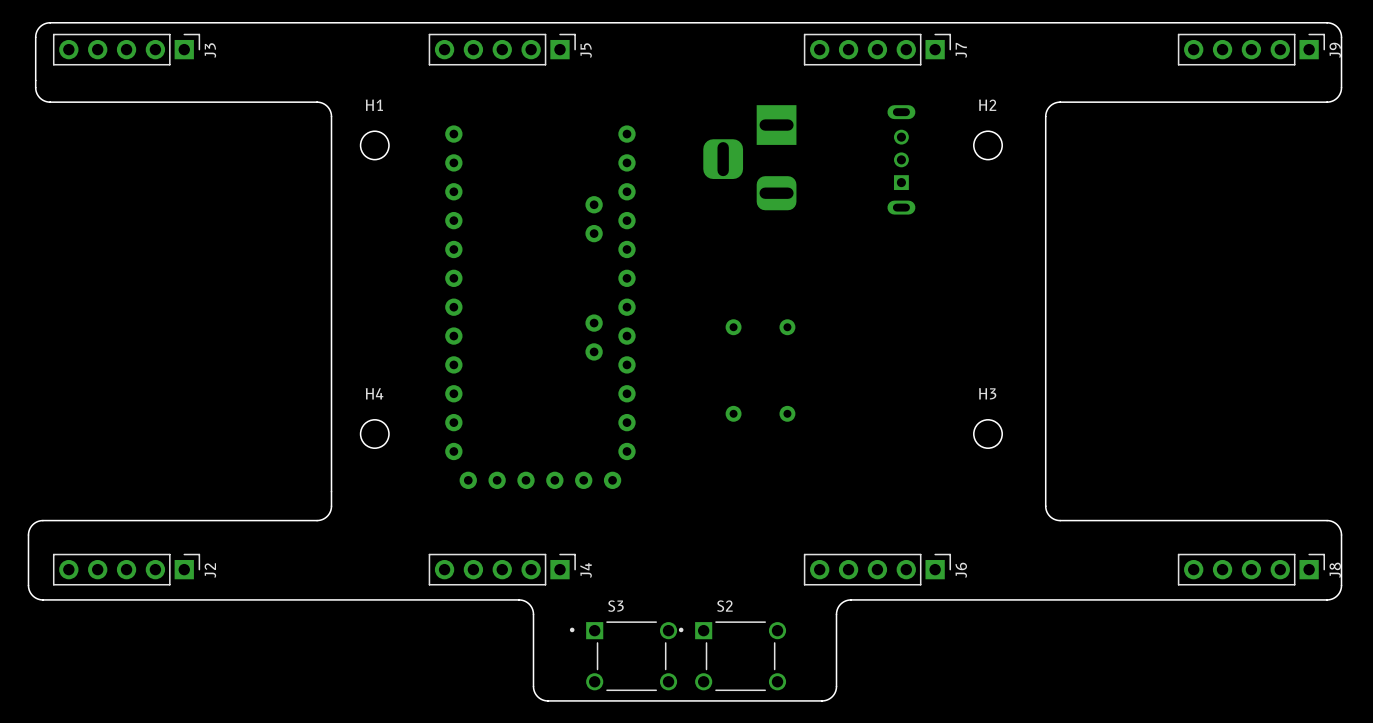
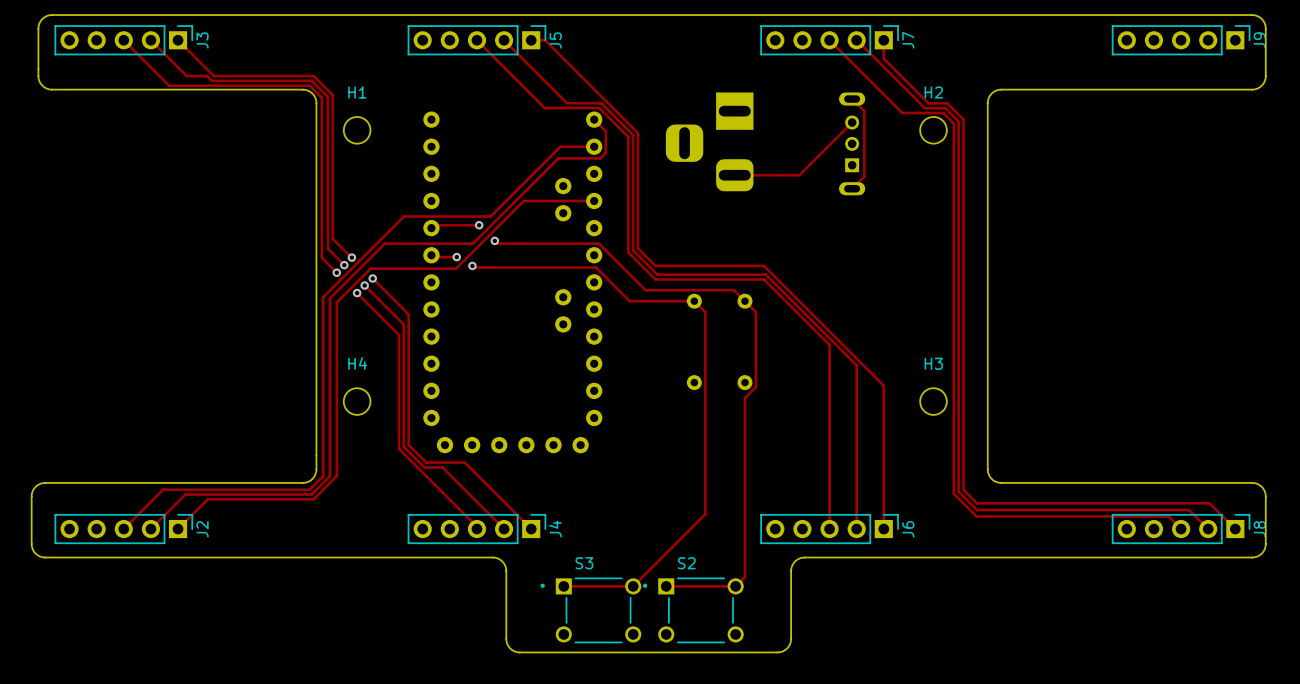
track: none -> (123, 40) (169, 85) (309, 85) (321, 97) (321, 257) (336, 272)
track: none -> (150, 40) (186, 76) (207, 76) (211, 80) (311, 80) (327, 97) (327, 248) (344, 265)
track: none -> (178, 40) (213, 76) (313, 76) (332, 95) (332, 238) (351, 257)
track: none -> (476, 40) (544, 108) (599, 108) (628, 137) (628, 252) (655, 279) (763, 279) (829, 345) (829, 529)
track: none -> (504, 40) (567, 103) (601, 103) (633, 135) (633, 250) (657, 274) (765, 274) (856, 365) (856, 529)
track: none -> (531, 40) (545, 40) (637, 133) (637, 248) (655, 265) (764, 265) (883, 385) (883, 529)
track: none -> (829, 40) (902, 112) (943, 112) (953, 123) (953, 493) (976, 516) (1168, 516) (1181, 529)
track: none -> (856, 40) (924, 108) (945, 108) (958, 121) (958, 491) (976, 510) (1189, 510) (1208, 529)
track: none -> (883, 40) (883, 58) (928, 103) (947, 103) (963, 119) (963, 489) (976, 503) (1209, 503) (1235, 529)
track: none -> (852, 99) (864, 111) (864, 176) (852, 188)
track: none -> (594, 119) (605, 131) (605, 152) (600, 158) (558, 158) (473, 243) (384, 243) (330, 298) (330, 476) (311, 494) (185, 494) (150, 529)
track: none -> (852, 122) (799, 175) (734, 175)
track: none -> (594, 146) (560, 146) (490, 216) (403, 216) (323, 297) (323, 476) (309, 489) (163, 489) (123, 529)
track: none -> (594, 200) (523, 200) (456, 268) (370, 268) (336, 302) (336, 476) (313, 499) (207, 499) (178, 529)
track: none -> (479, 225) (434, 225) (431, 228)
via: none -> (479, 225)
track: none -> (494, 240) (497, 243) (599, 243) (645, 290) (734, 290) (755, 312) (755, 387) (745, 398) (745, 577) (735, 586) (666, 586)
via: none -> (494, 240)
track: none -> (431, 255) (433, 257) (456, 257)
via: none -> (351, 257)
via: none -> (456, 257)
via: none -> (344, 265)
track: none -> (472, 265) (473, 267) (596, 267) (629, 301) (694, 301) (705, 312) (705, 514) (633, 586) (563, 586)
via: none -> (472, 265)
via: none -> (336, 272)
track: none -> (372, 278) (408, 314) (408, 444) (426, 462) (464, 462) (531, 529)
via: none -> (372, 278)
track: none -> (364, 285) (403, 324) (403, 446) (424, 467) (442, 467) (504, 529)
via: none -> (364, 285)
track: none -> (357, 293) (399, 334) (399, 448) (476, 526) (476, 529)
via: none -> (357, 293)

